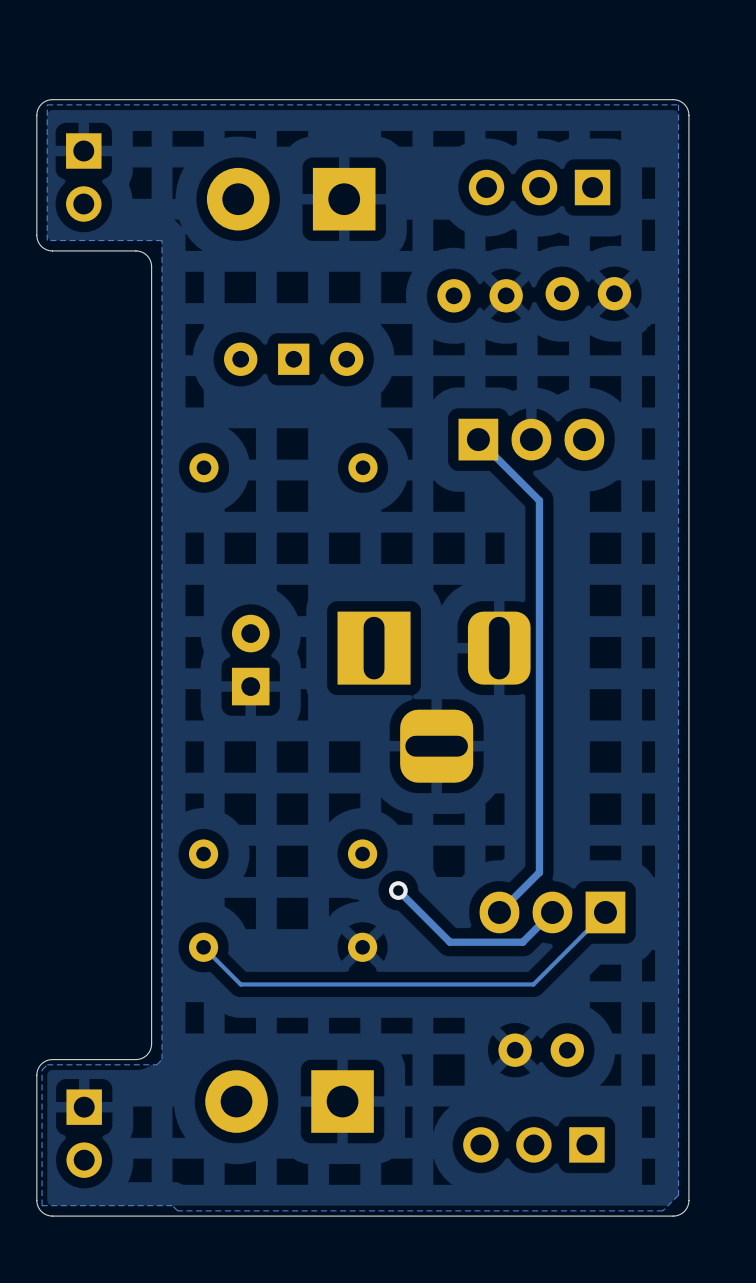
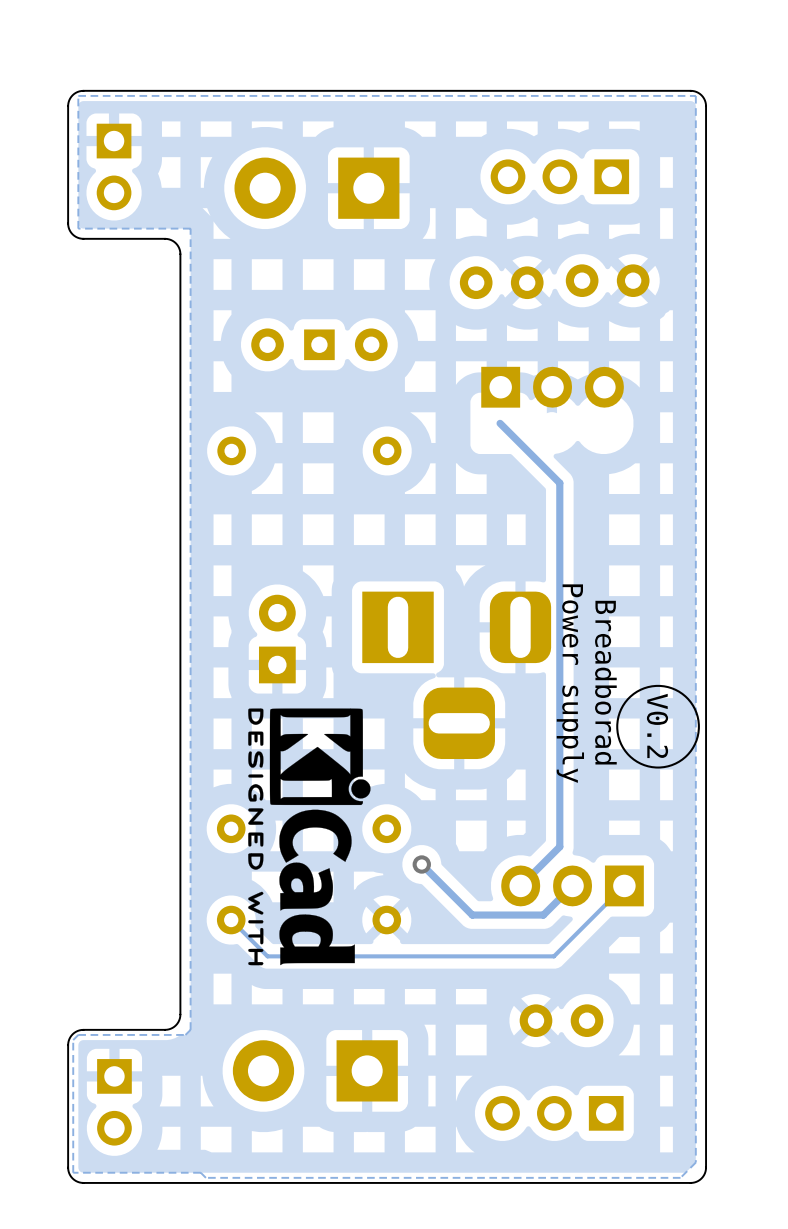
part position: (531, 439) -> (552, 387)
text: none -> Breadborad (605, 682)
text: none -> Power supply (570, 683)
drawing: none -> [616, 684, 700, 769]
drawing: none -> [248, 708, 371, 966]
text: none -> V0.2 (657, 725)

